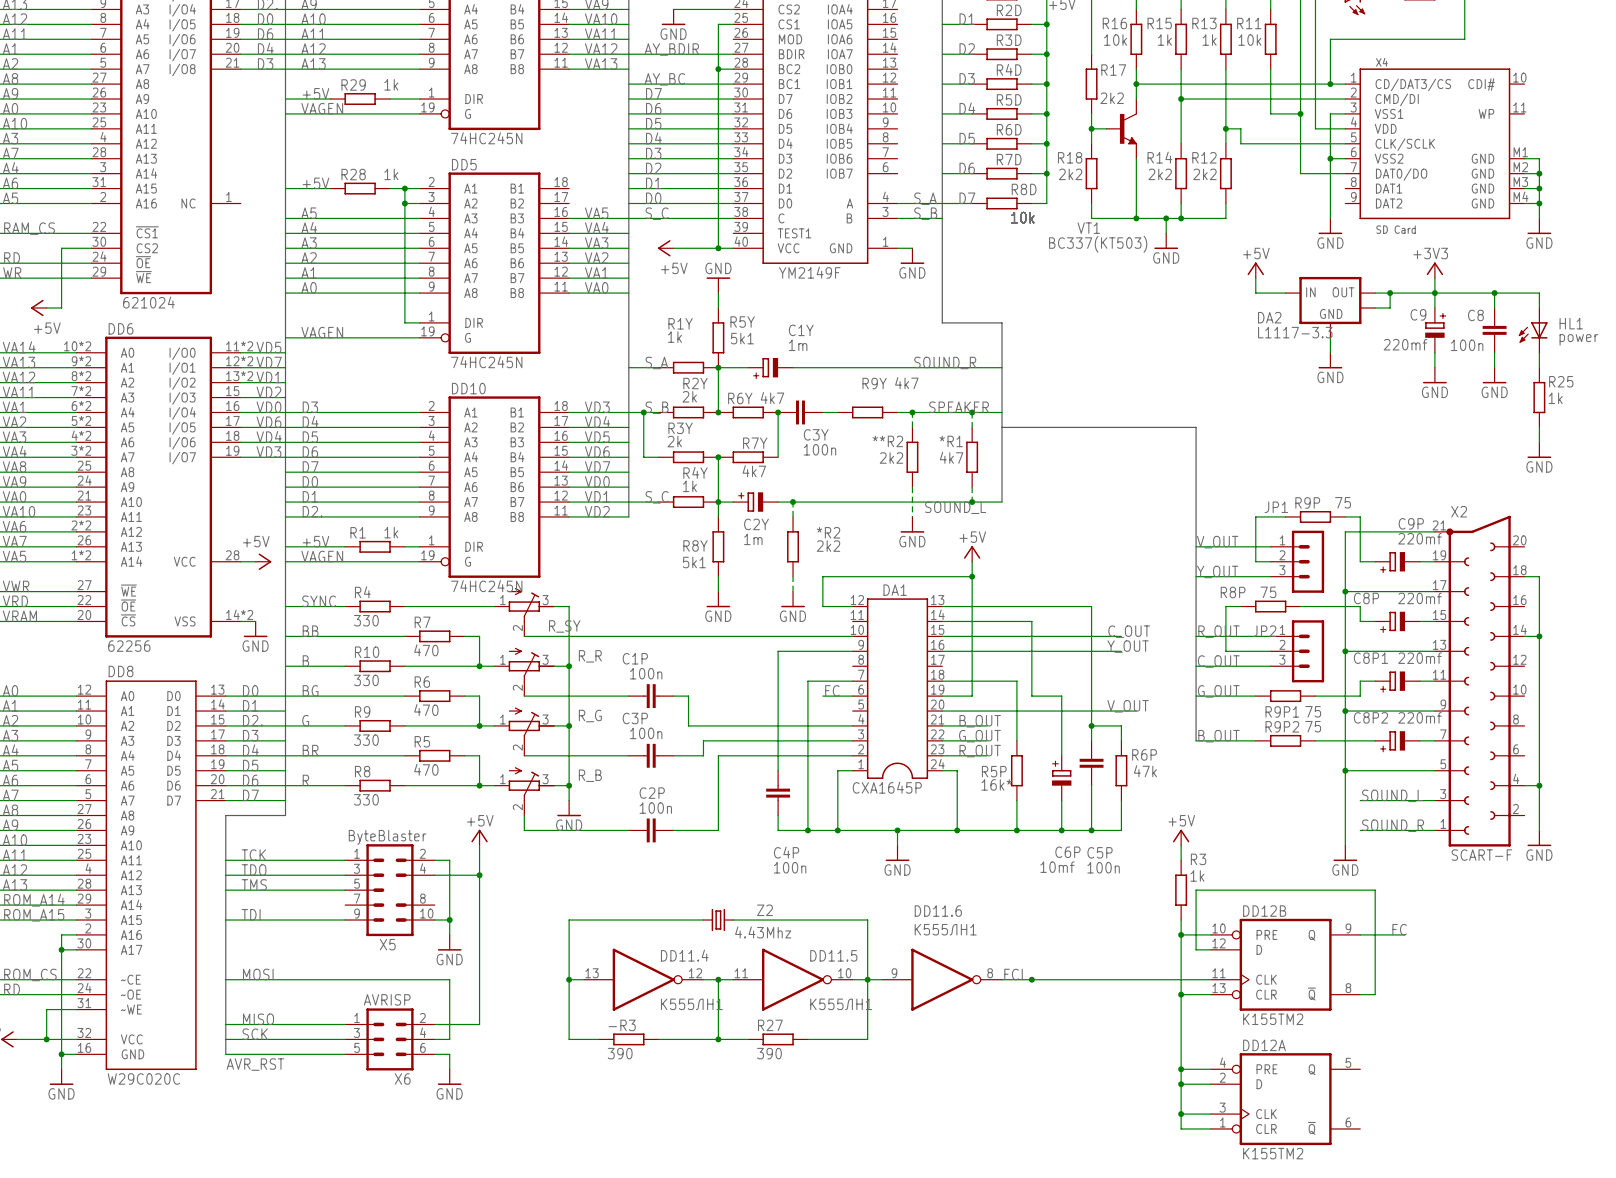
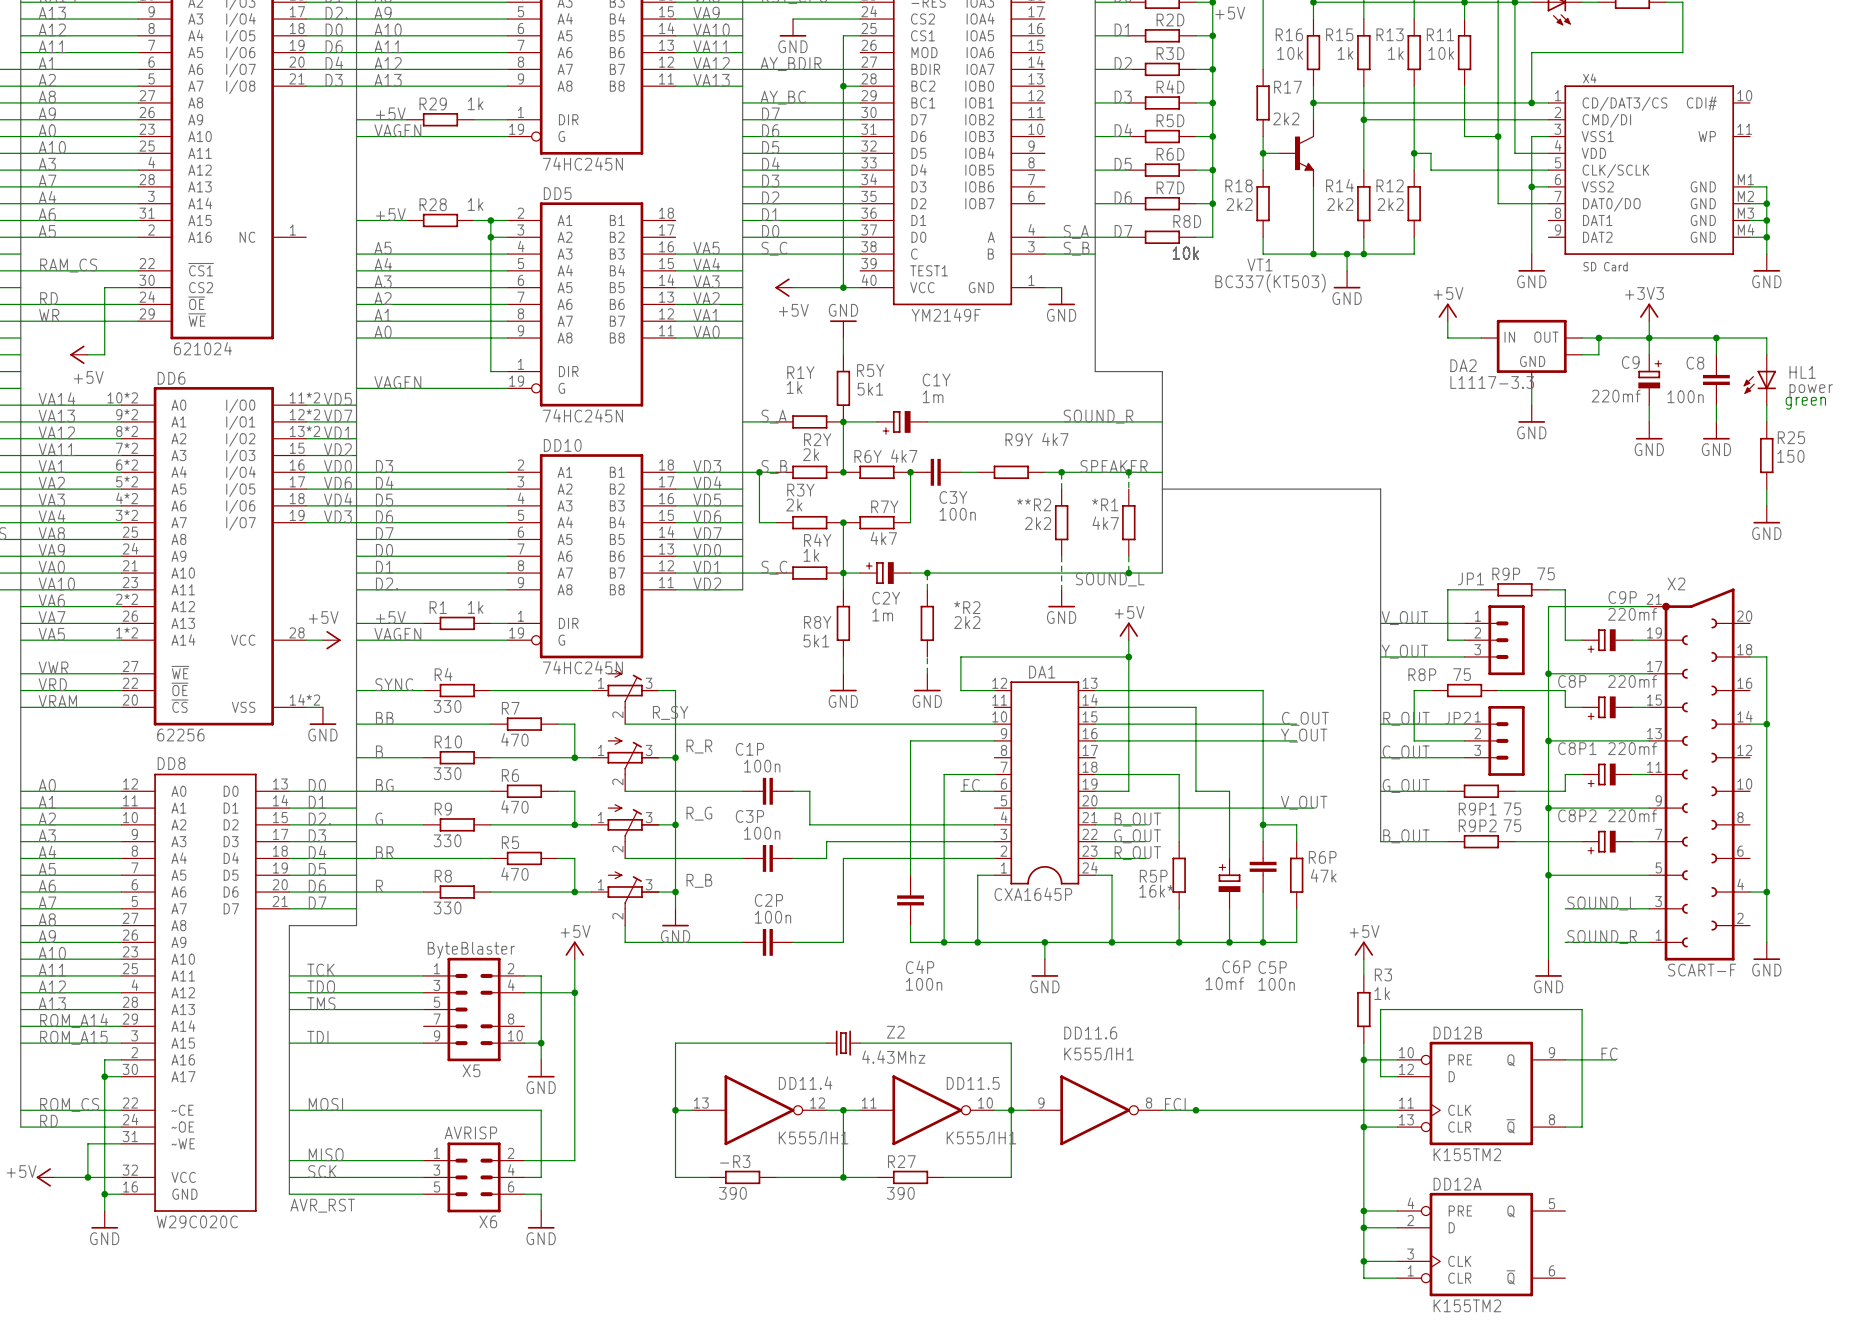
text: none -> green (1805, 403)
R25 value: 1k (1555, 398) -> 150 (1790, 456)

